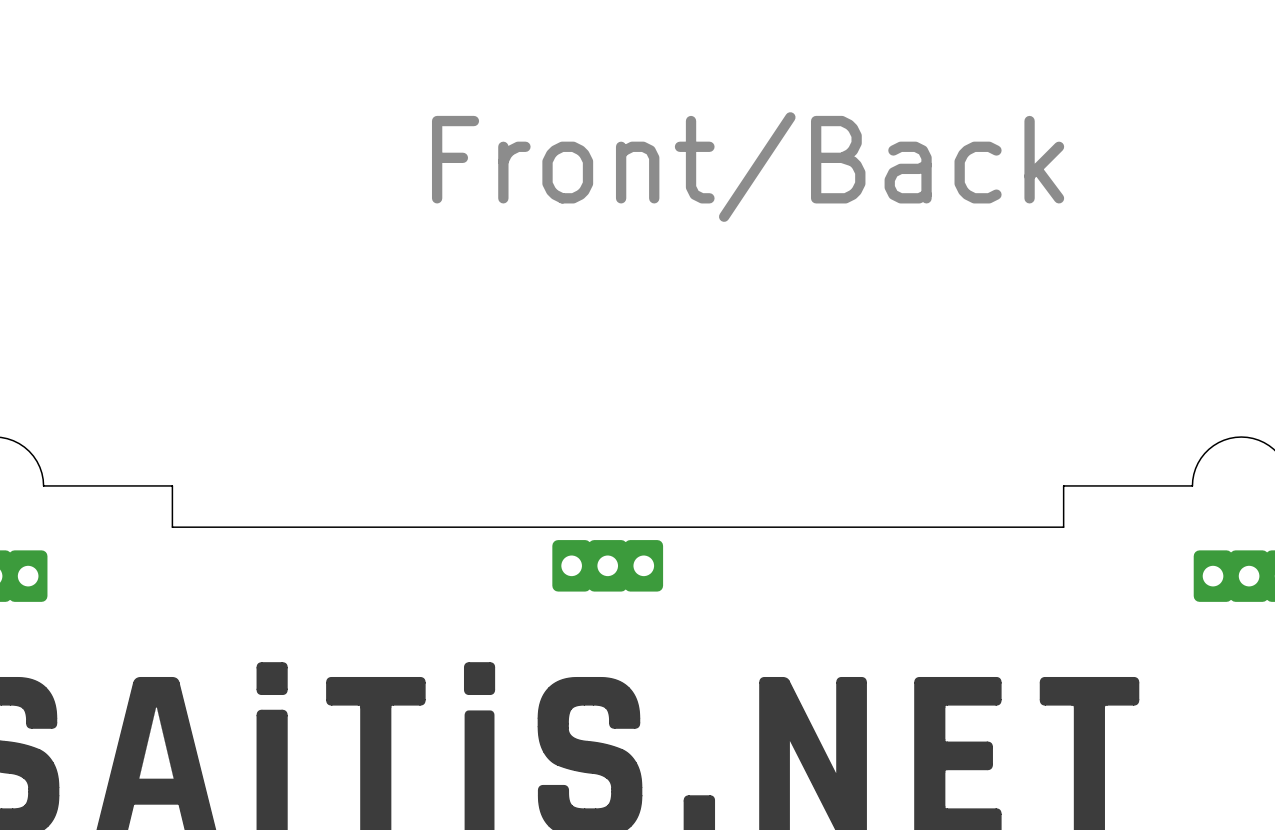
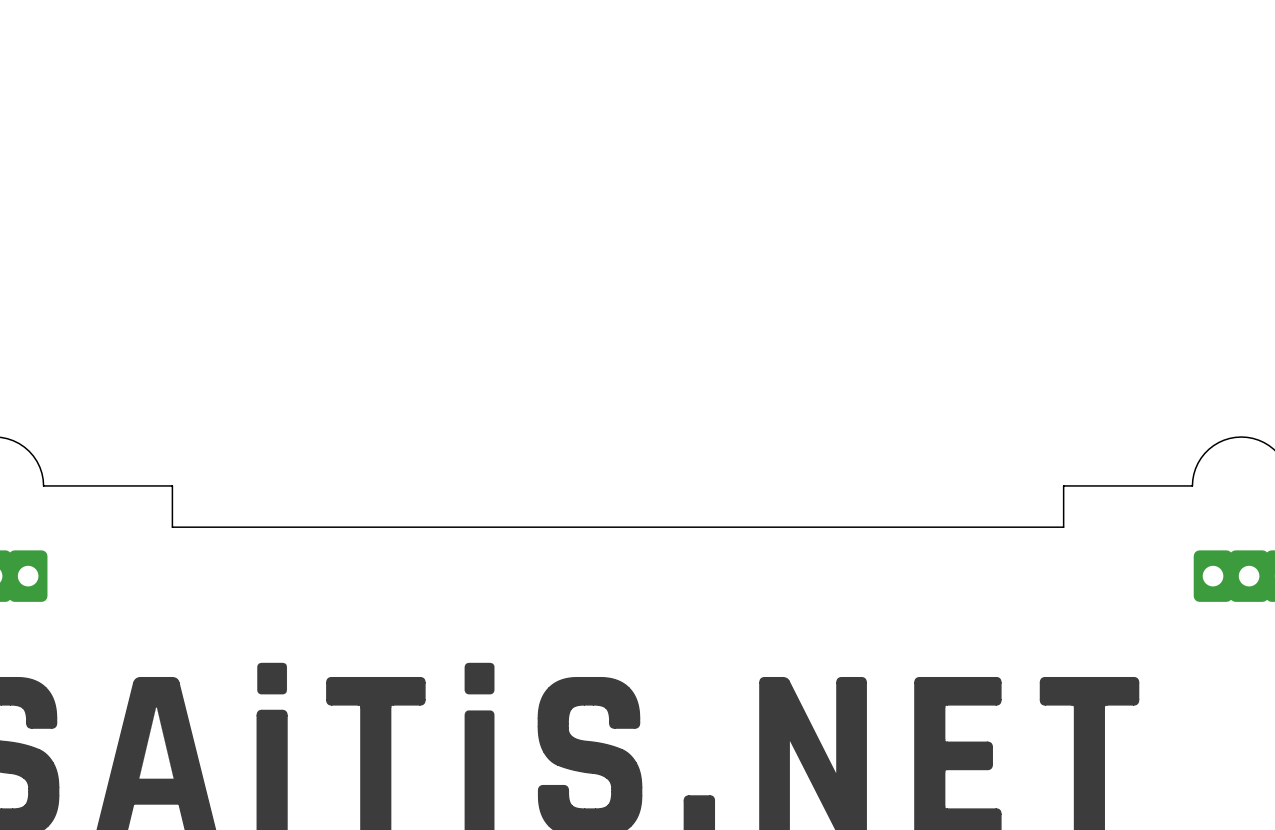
text: Front/Back (748, 167) -> none
part: (607, 565) -> none
line: (261, 662) (286, 664) (285, 693) (258, 692) (257, 666) (261, 662) -> none
line: (469, 662) (493, 664) (492, 693) (465, 692) (464, 666) (469, 662) -> none

